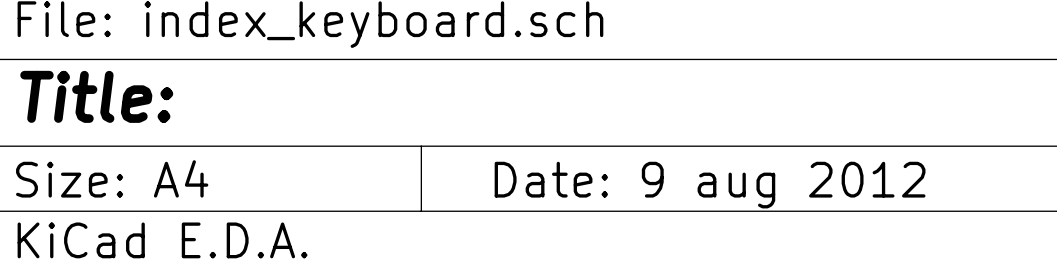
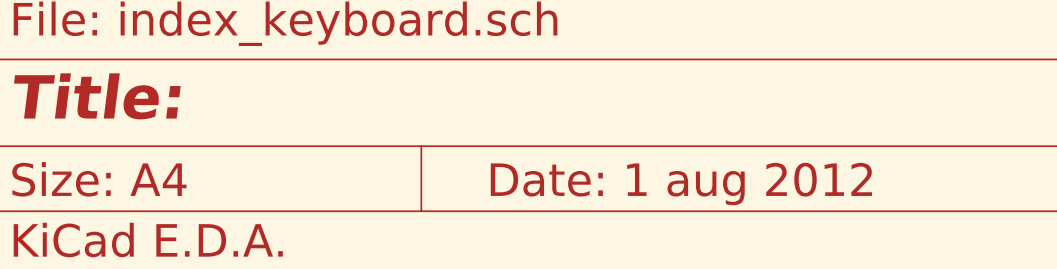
title block: Date: 9 aug 2012 (710, 185) -> Date: 1 aug 2012 (681, 184)

